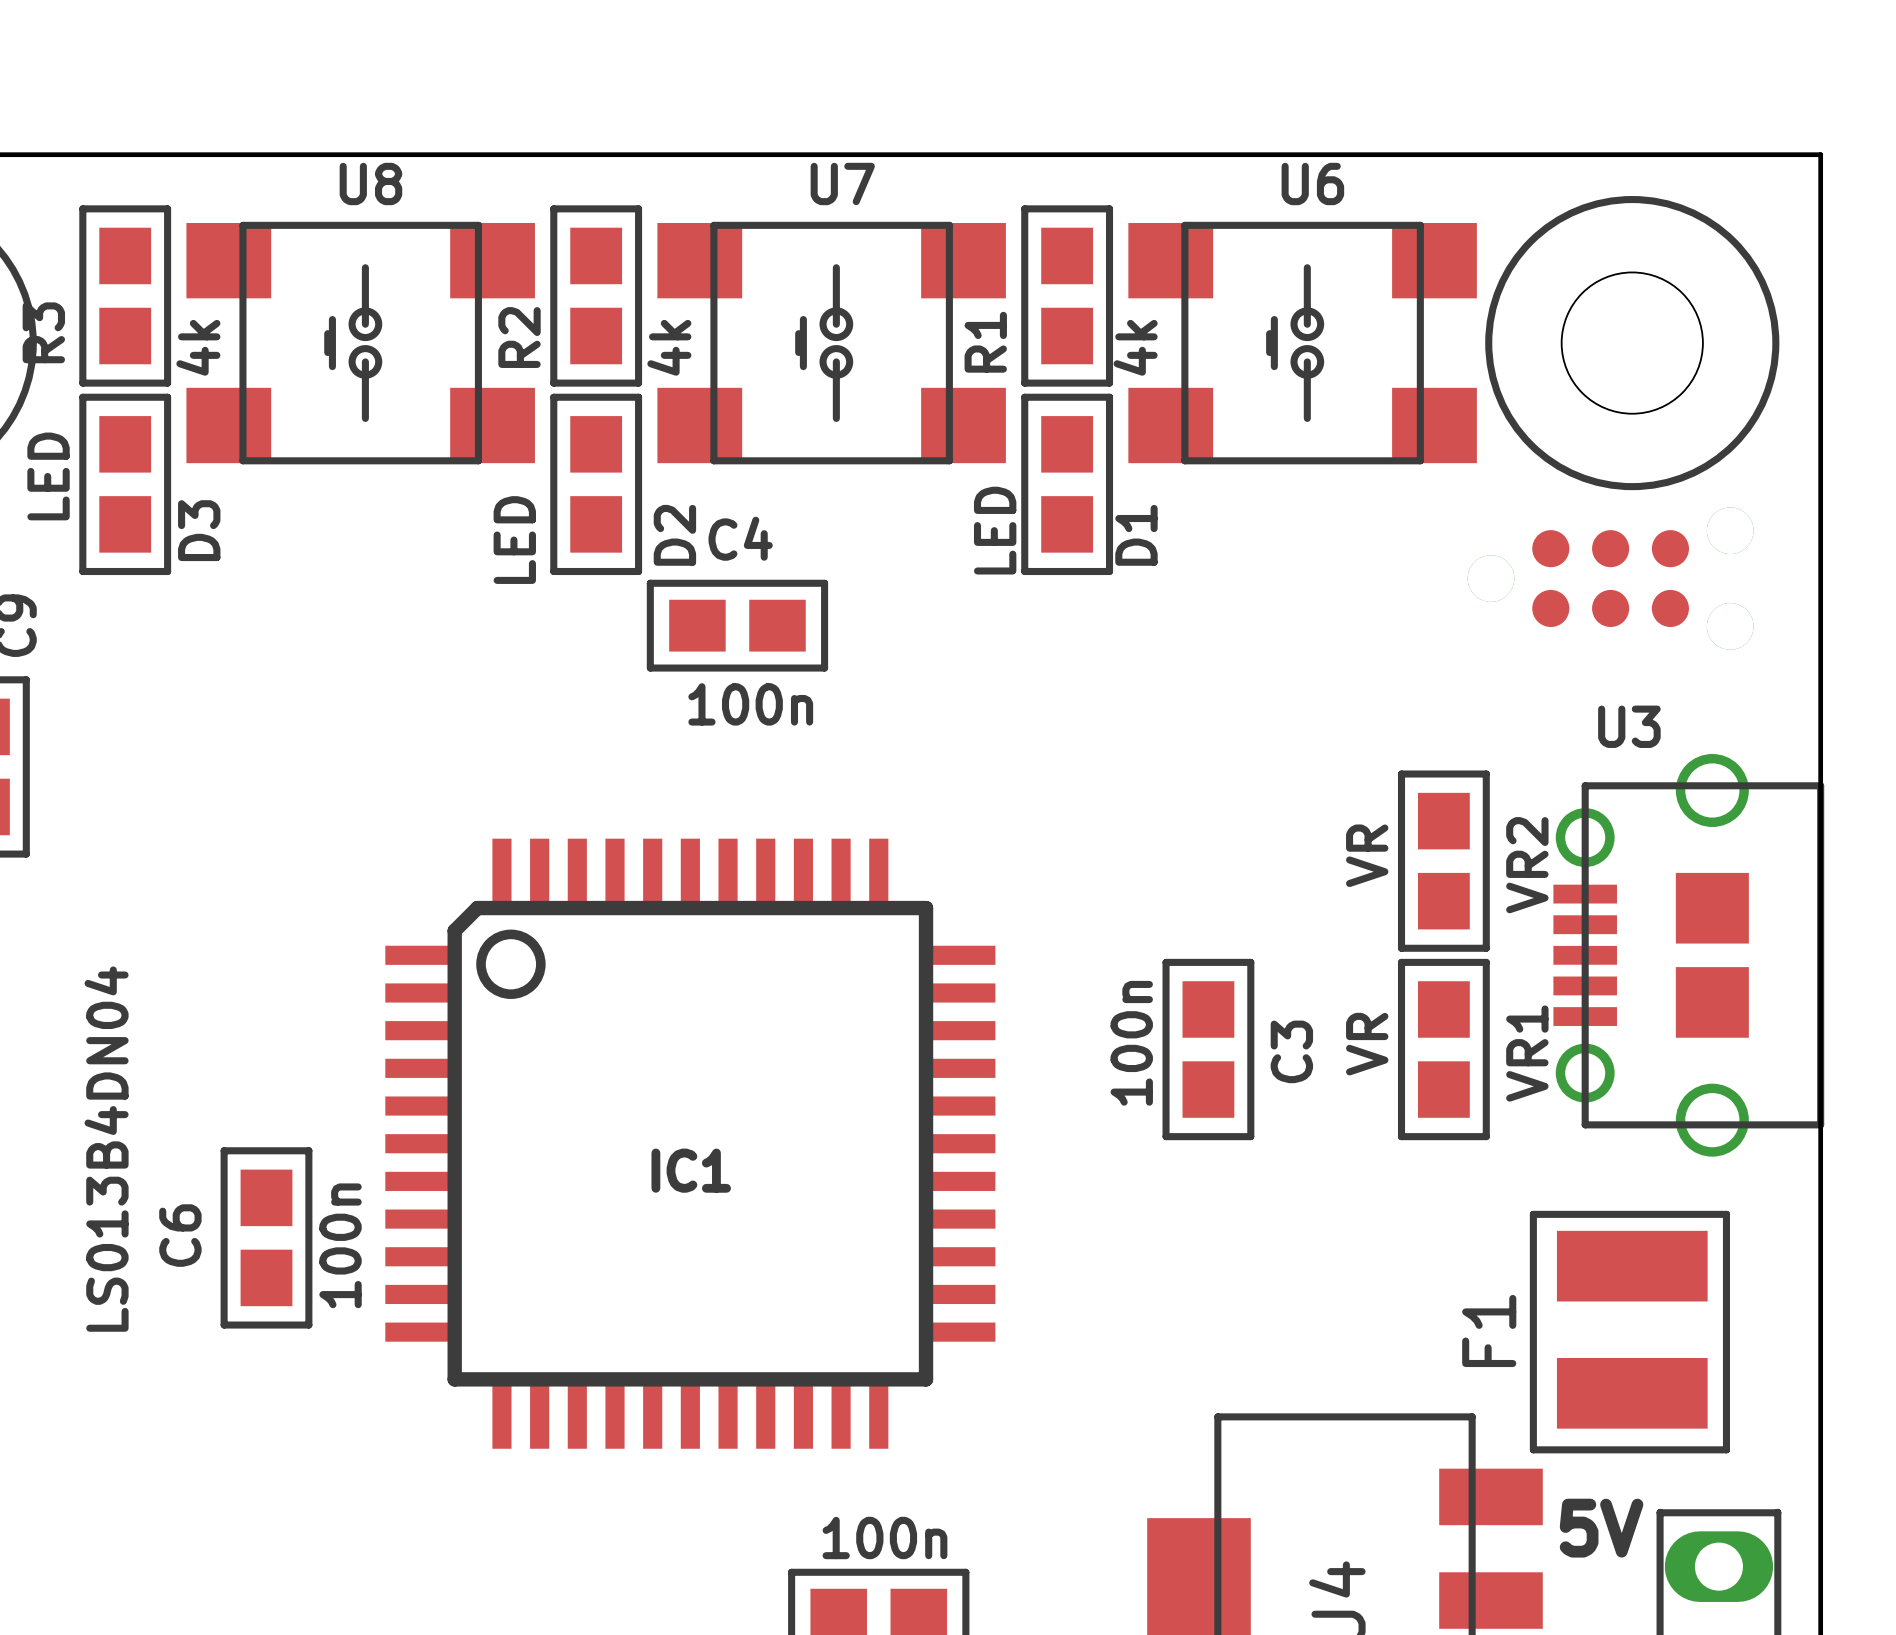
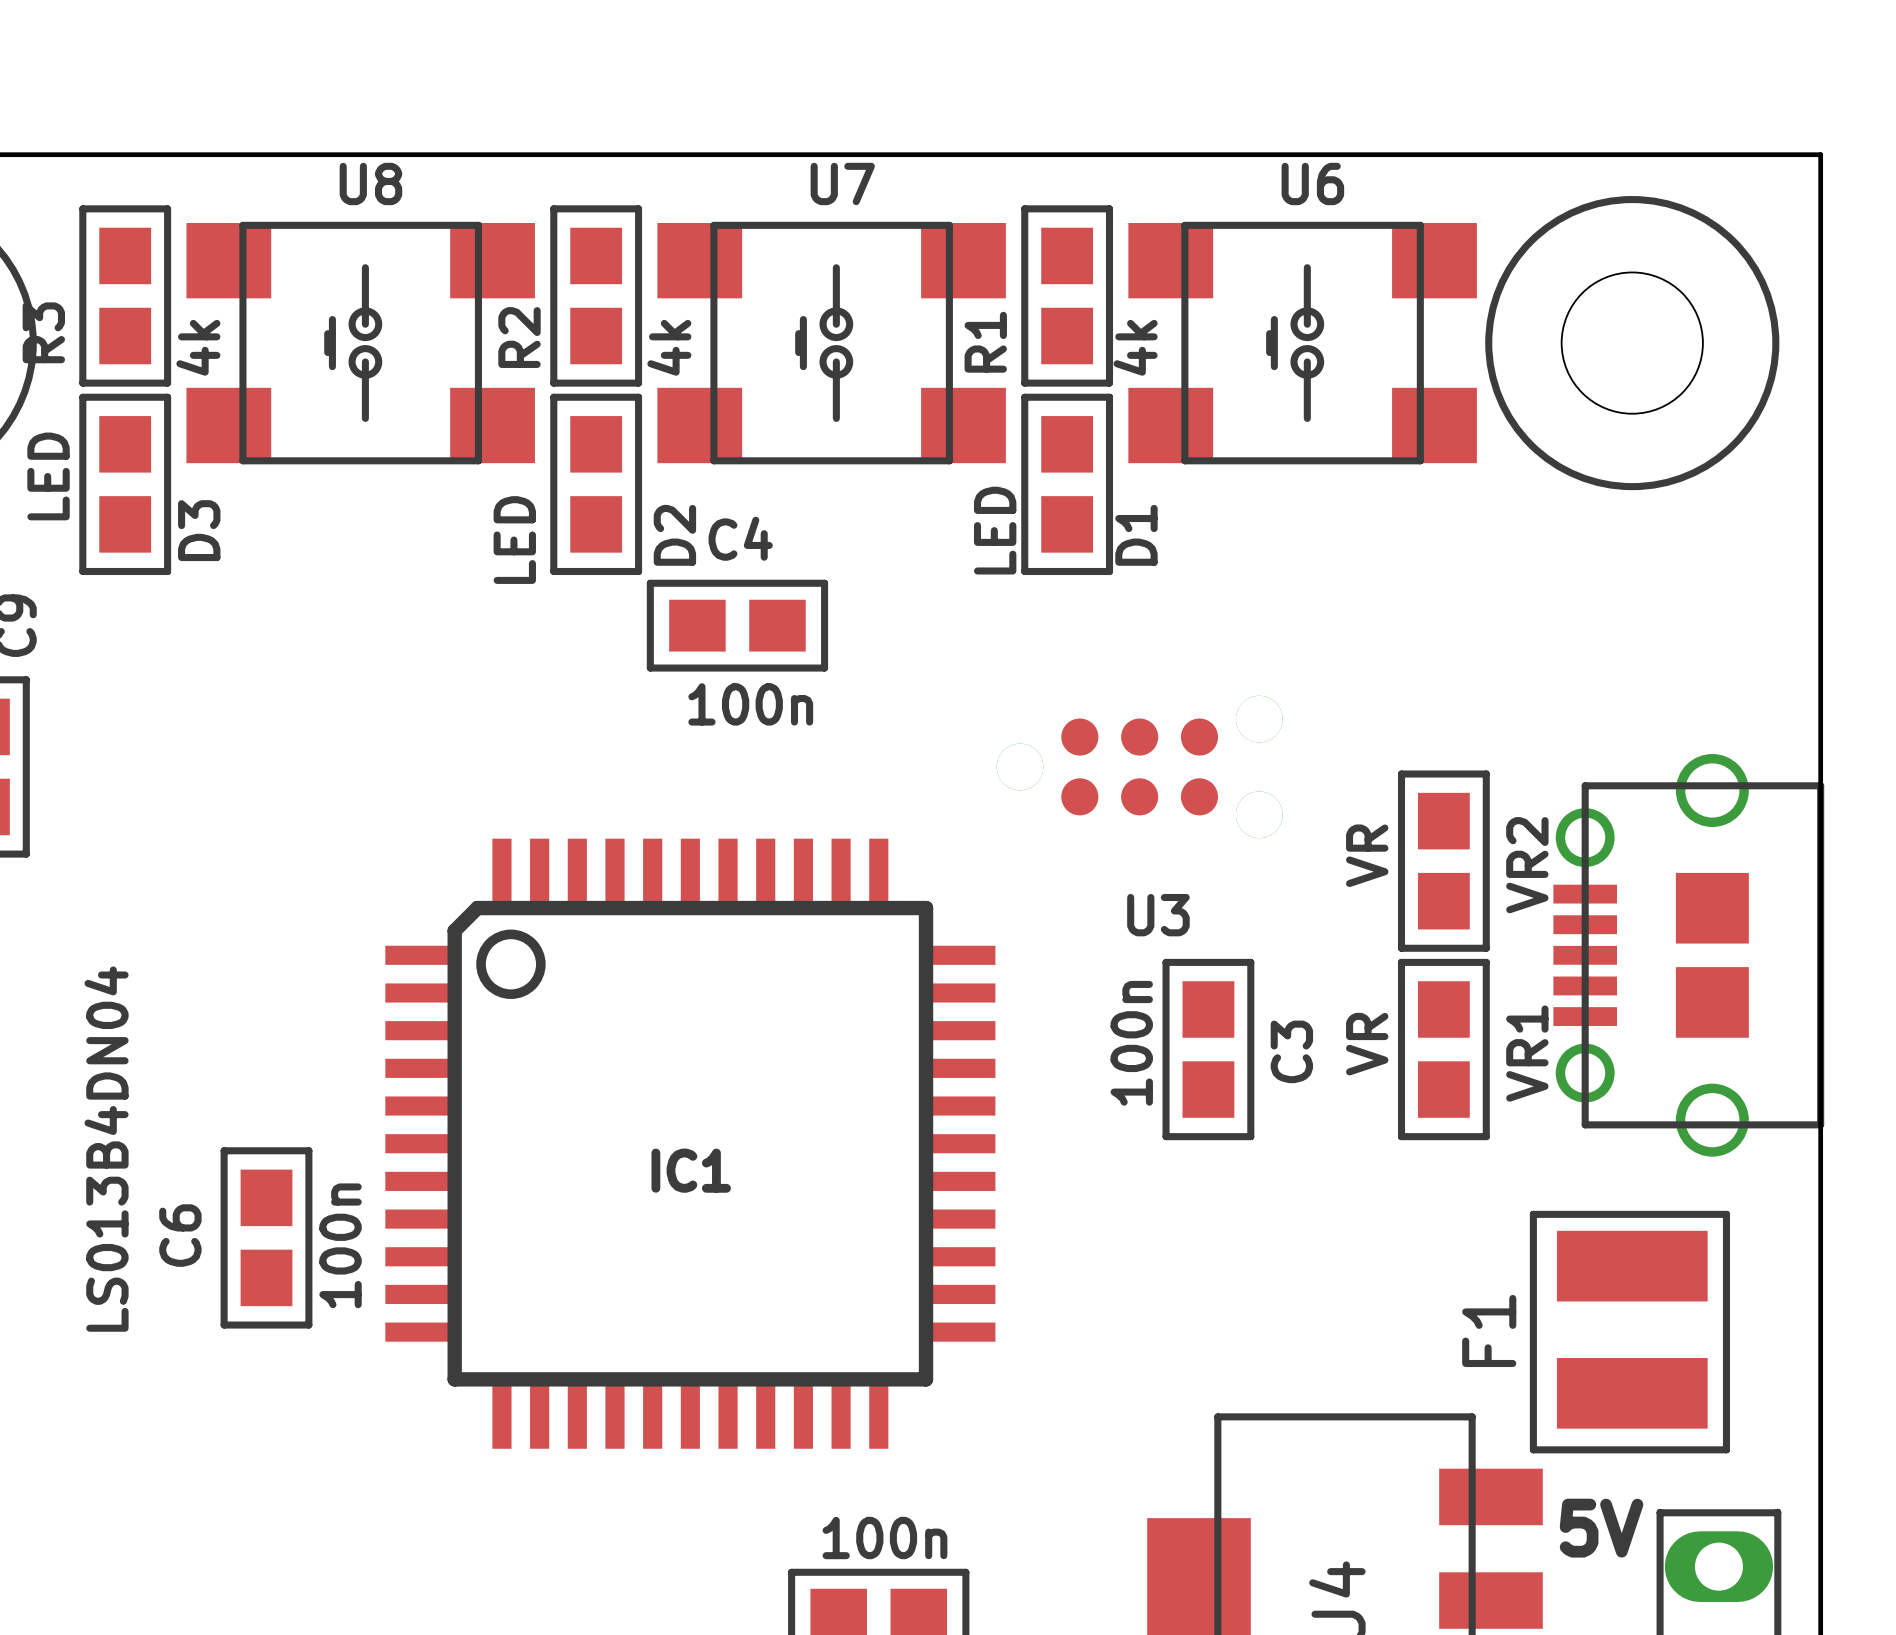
U3 position: (1610, 578) -> (1139, 766)

